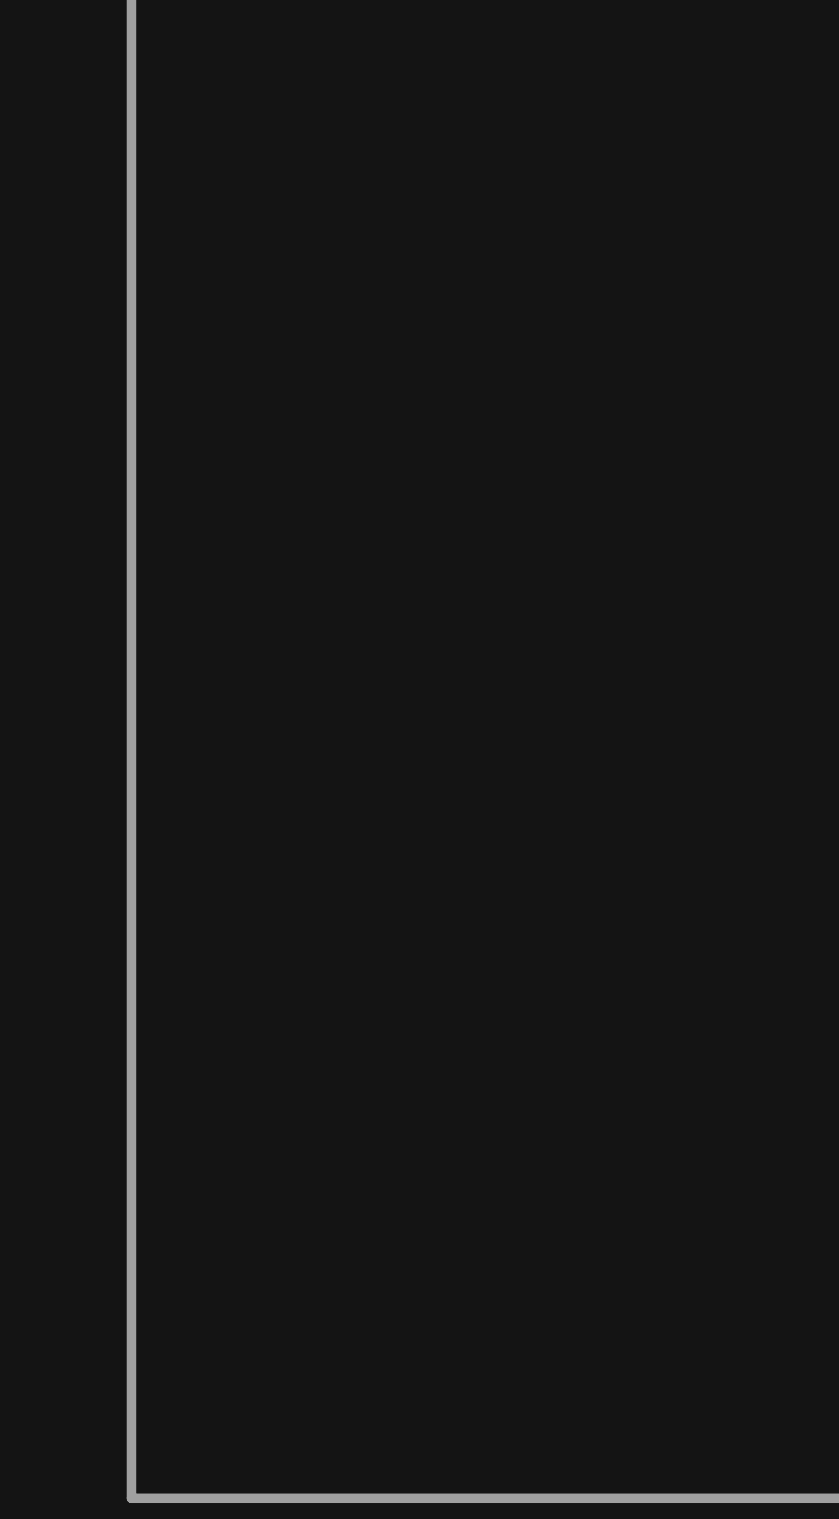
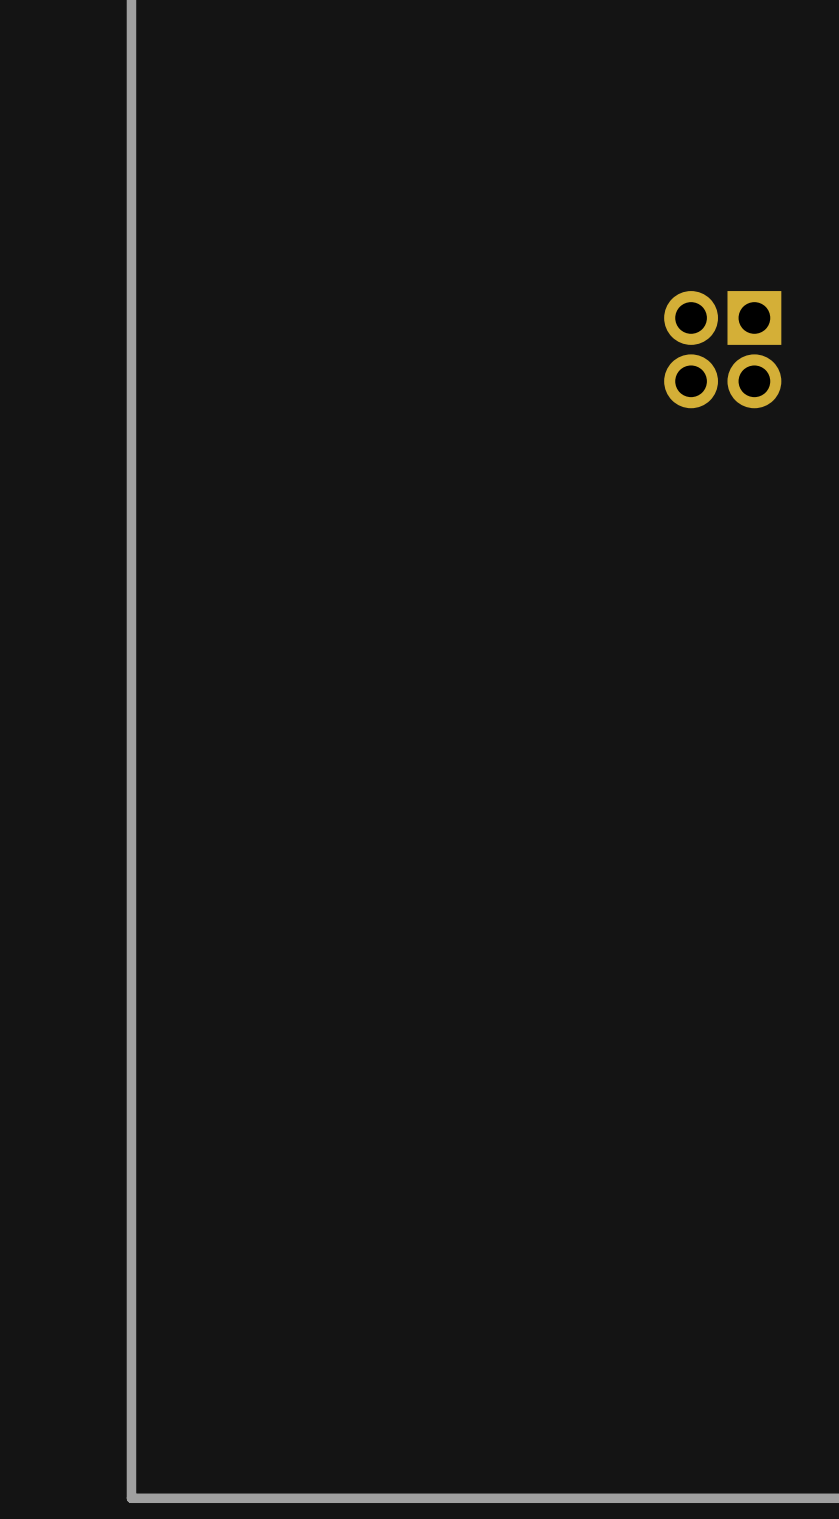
part: none -> (722, 349)

